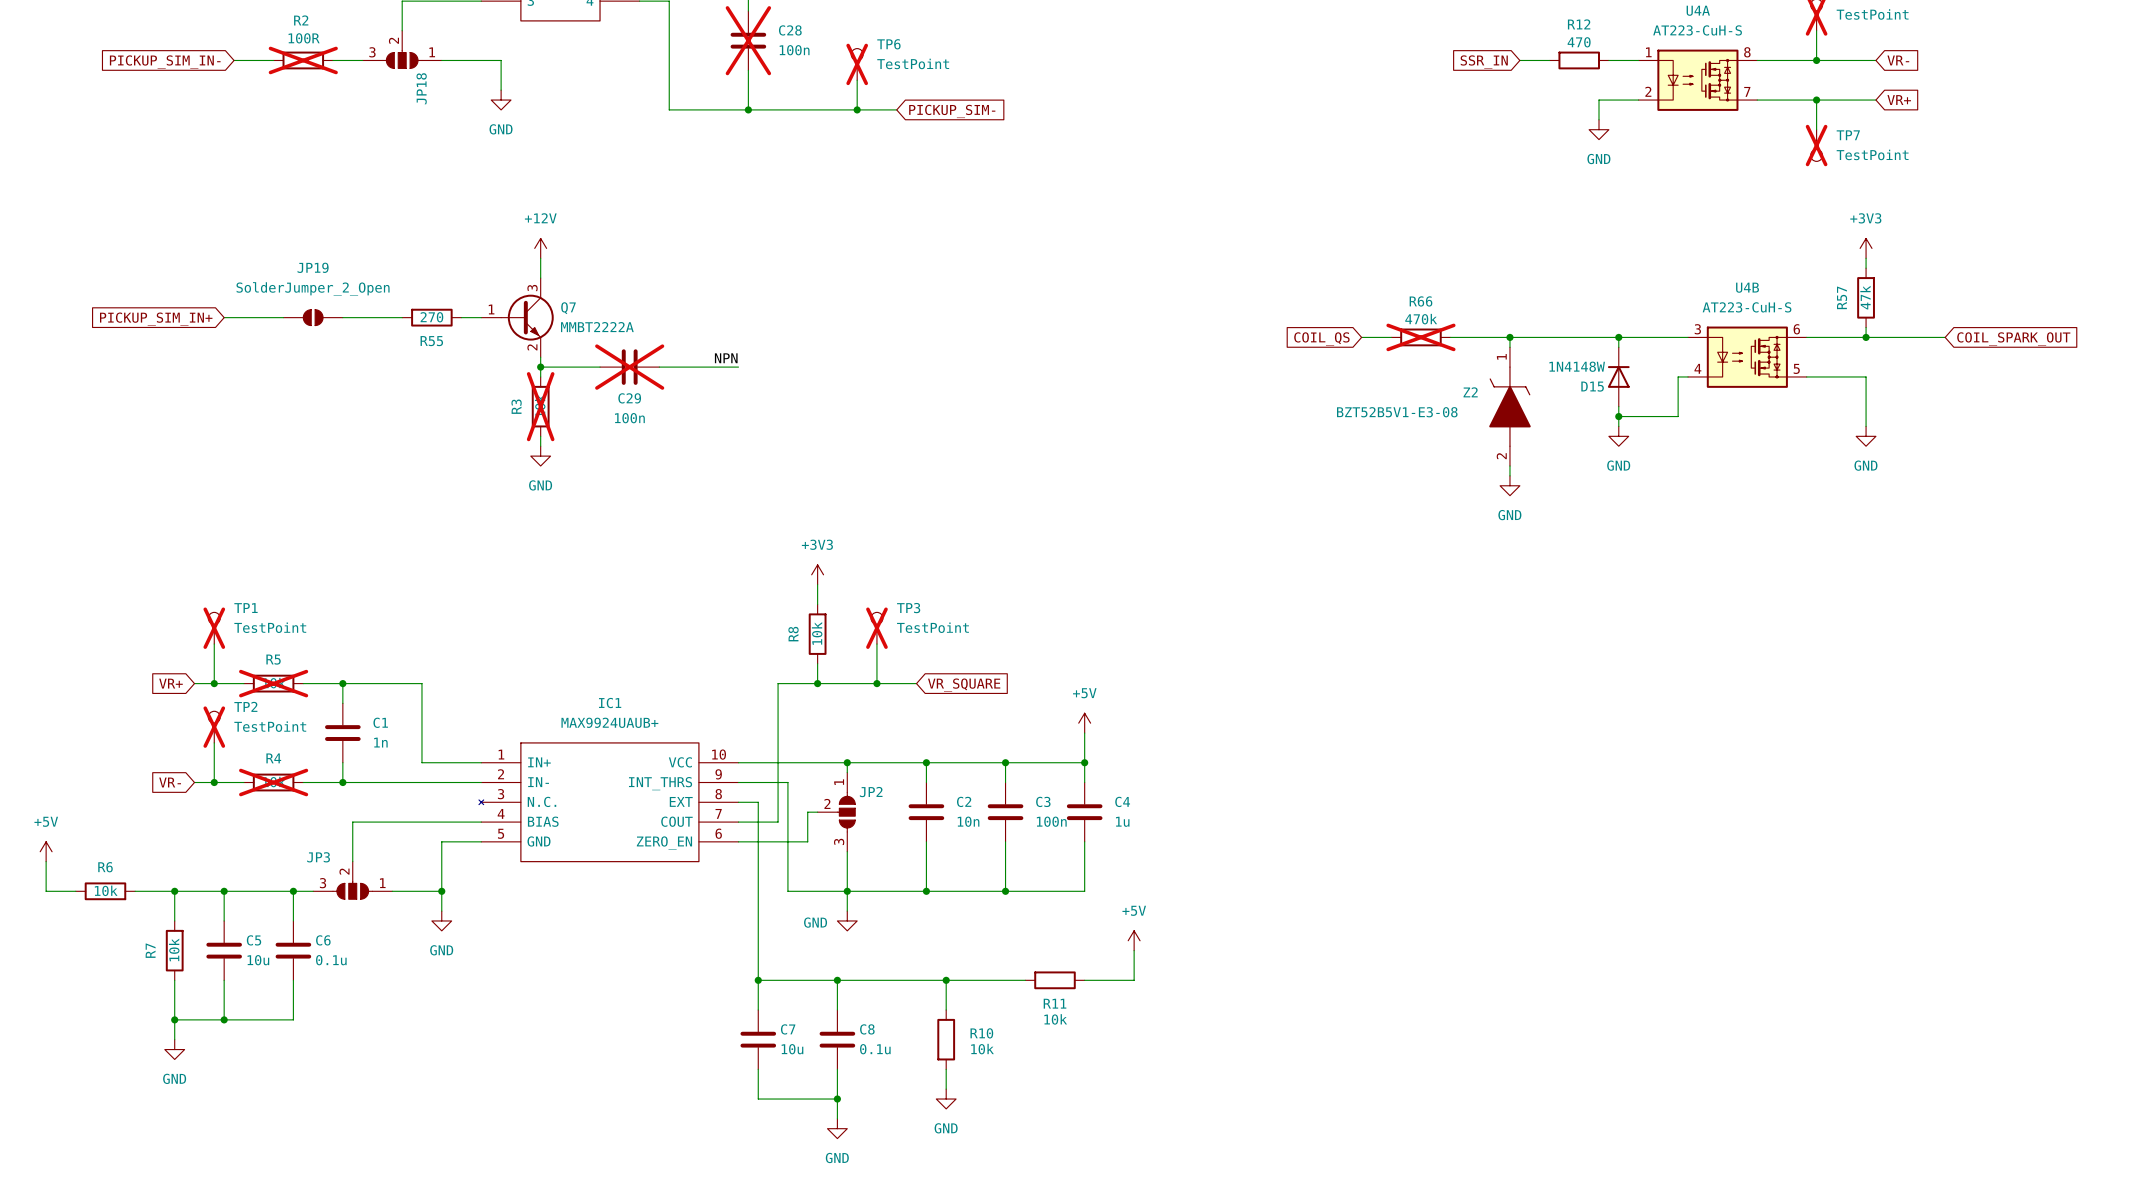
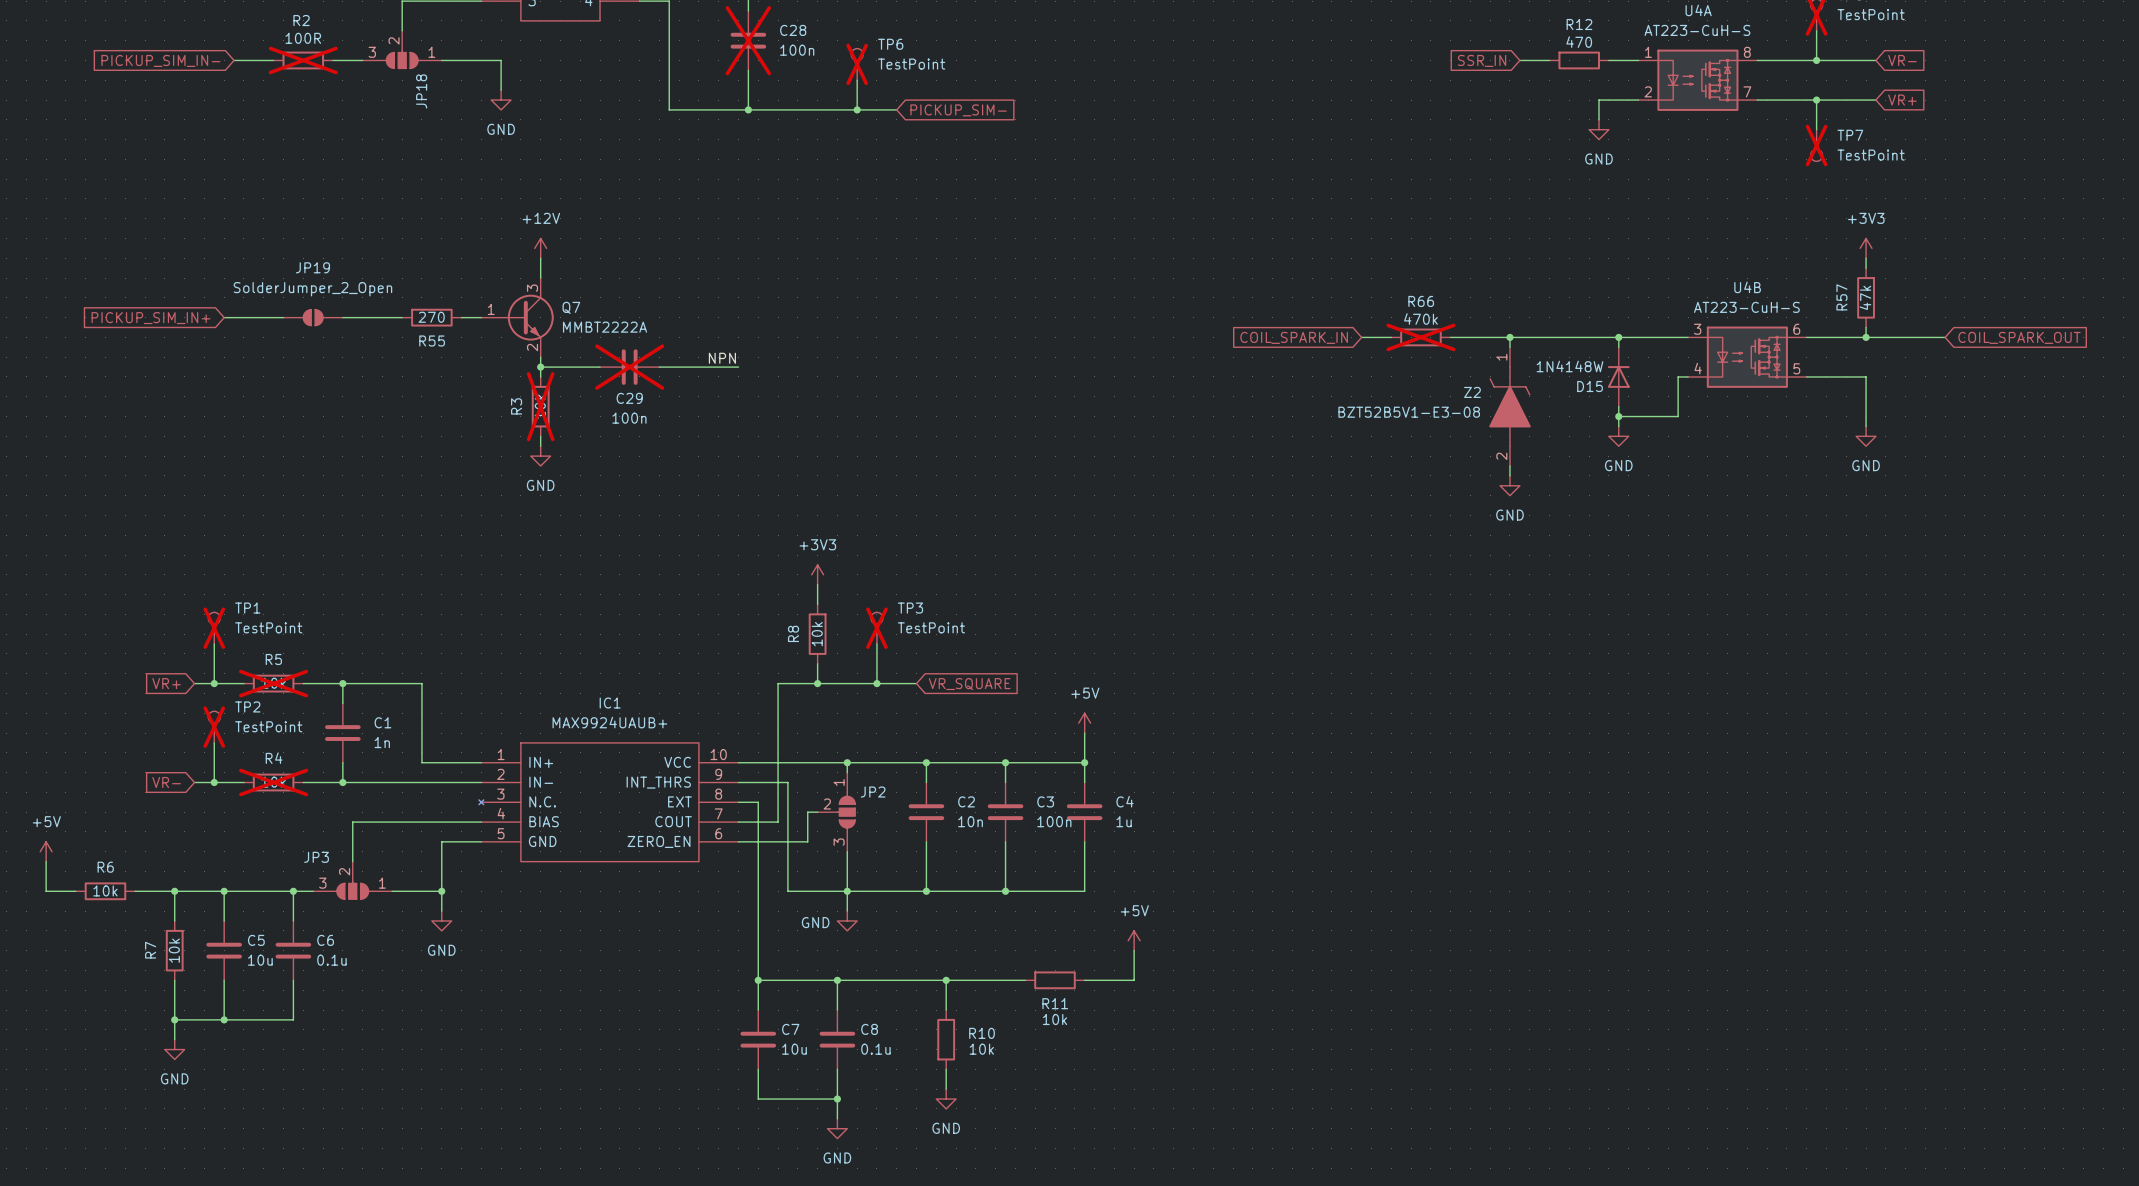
global label: COIL_QS (1321, 338) -> COIL_SPARK_IN (1294, 337)

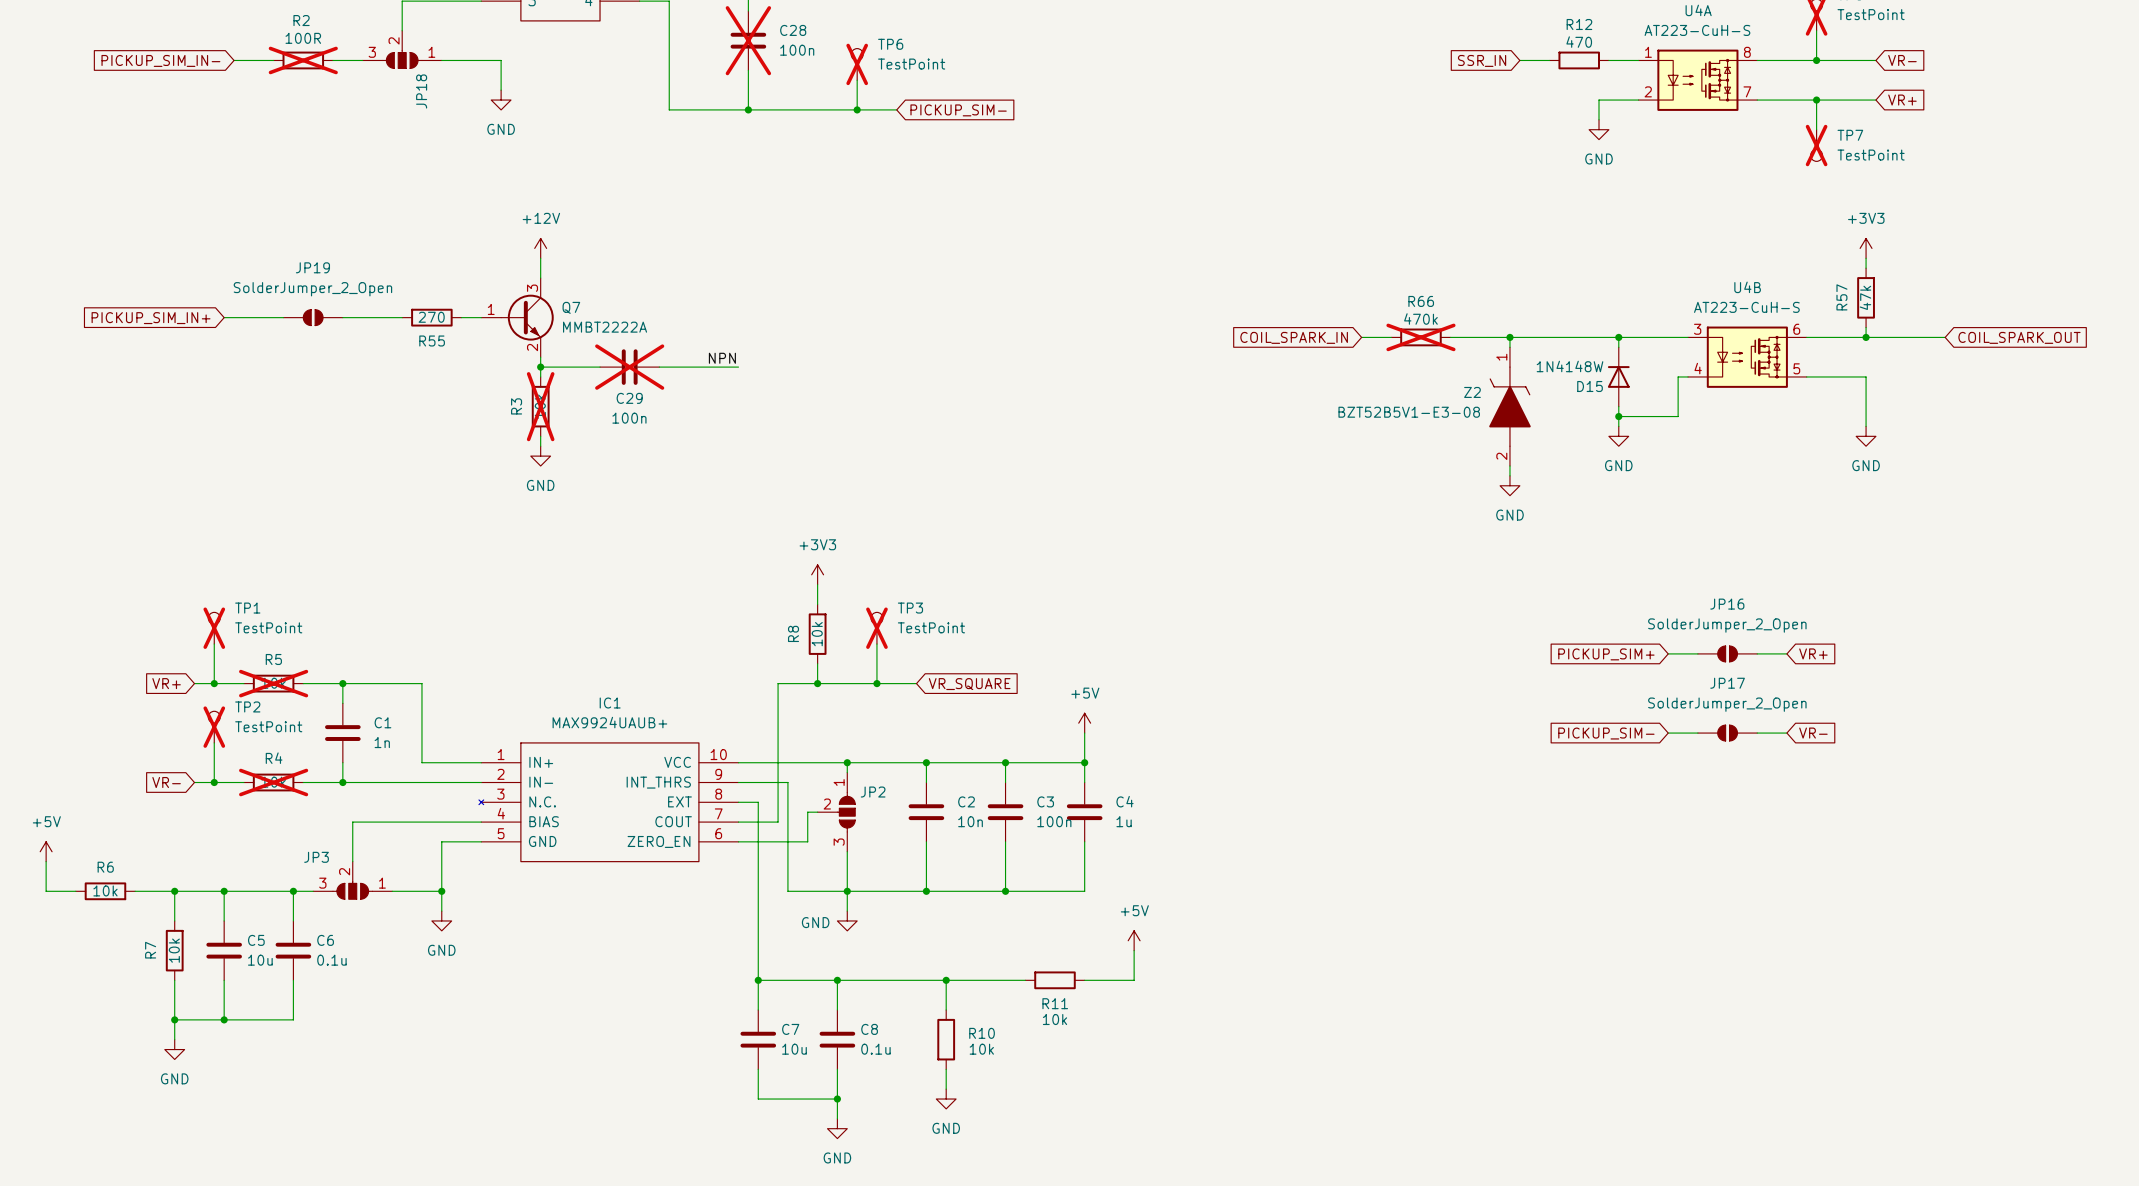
wire: none -> (1668, 653) (1697, 653)
JP16: none -> SolderJumper_2_Open (1727, 653)
wire: none -> (1757, 653) (1786, 653)
global label: none -> VR+ (1813, 653)
global label: none -> PICKUP_SIM+ (1606, 654)
global label: none -> PICKUP_SIM- (1606, 733)
wire: none -> (1668, 733) (1697, 733)
JP17: none -> SolderJumper_2_Open (1727, 733)
wire: none -> (1757, 733) (1786, 733)
global label: none -> VR- (1813, 733)

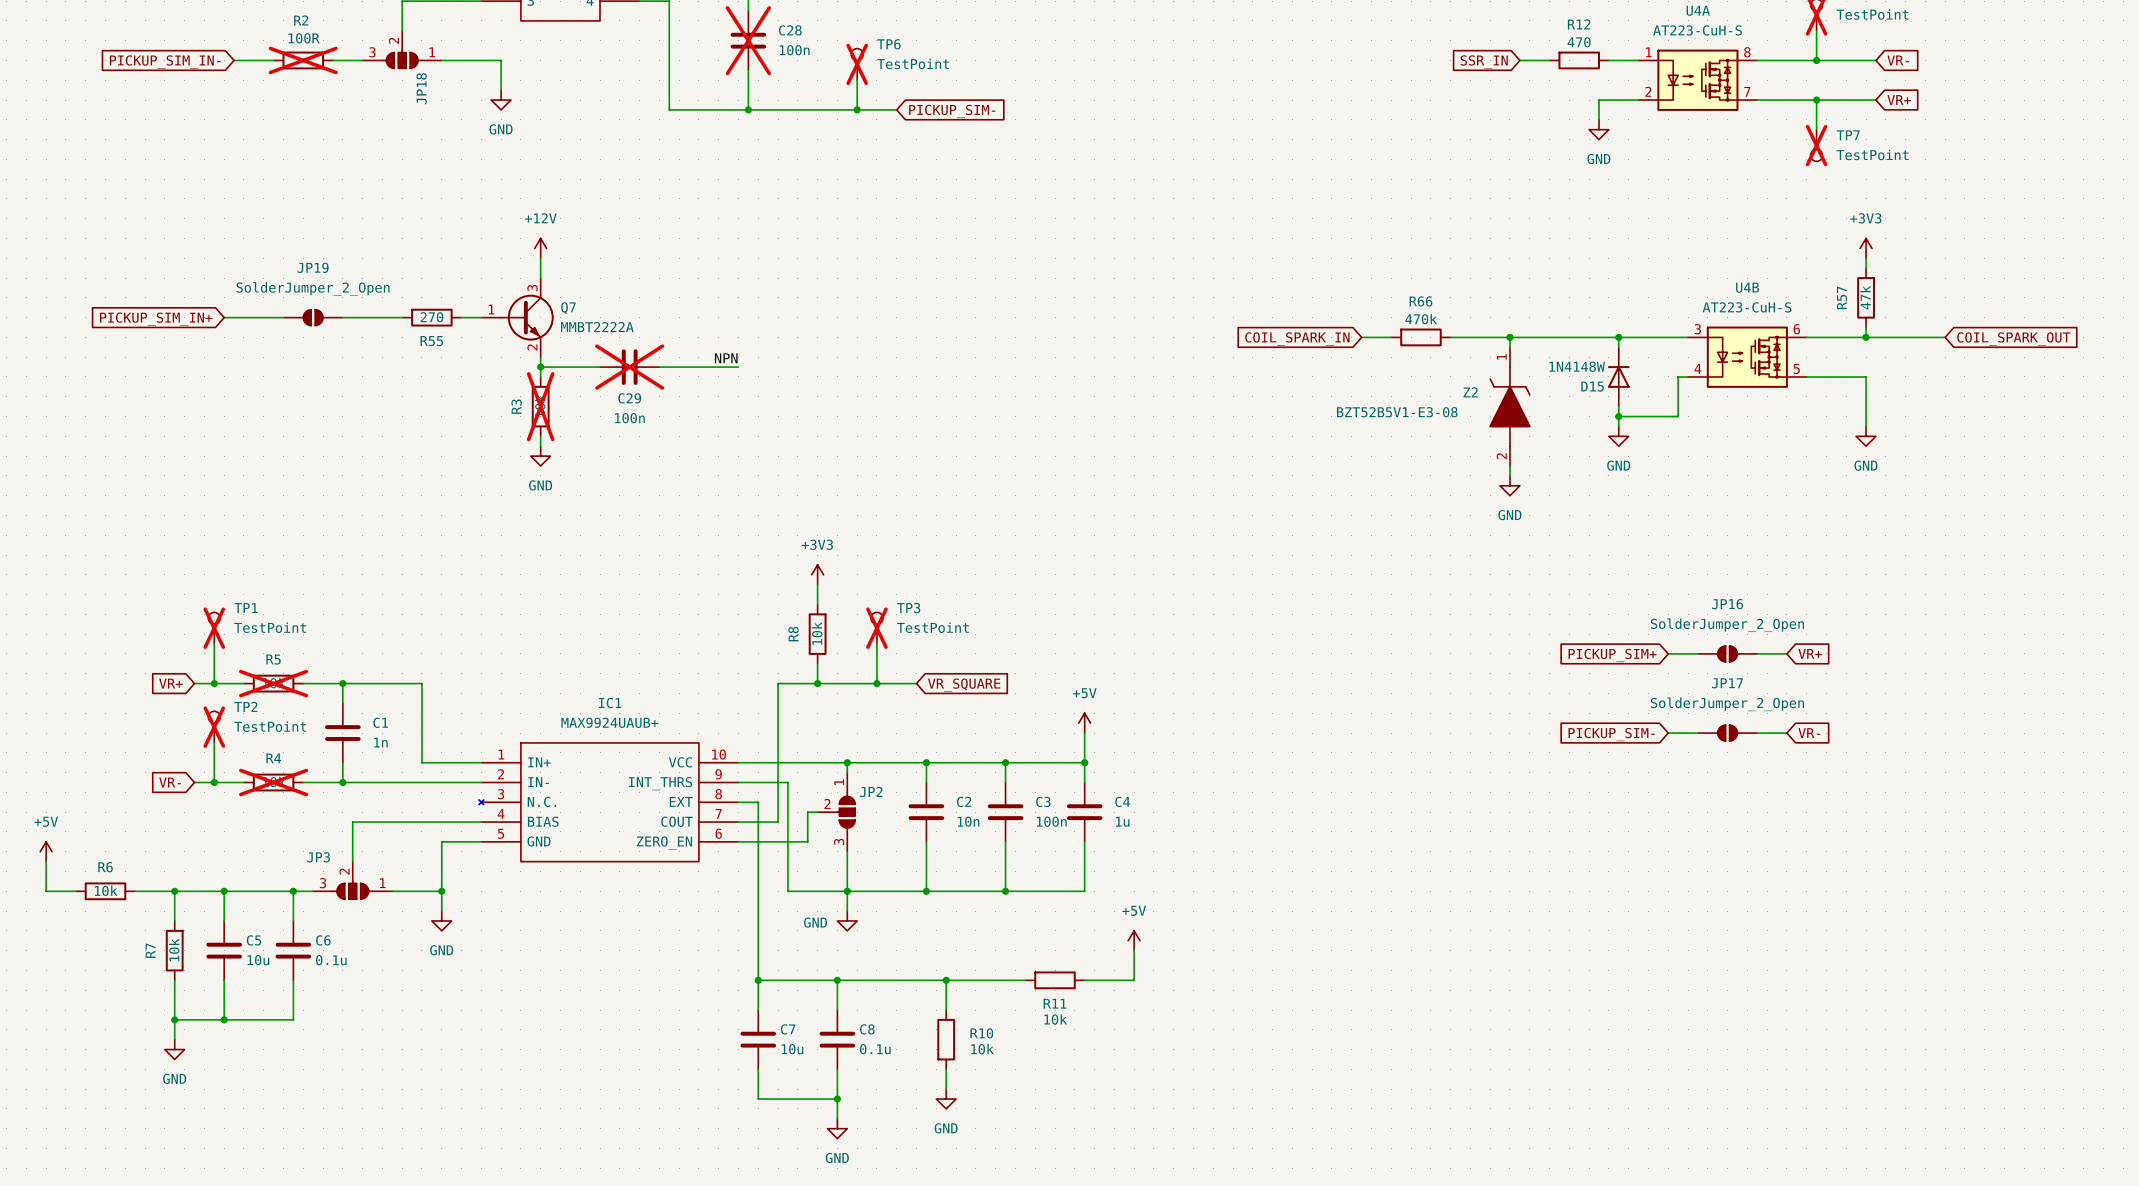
R66 do-not-place cross: (1420, 337) -> none

